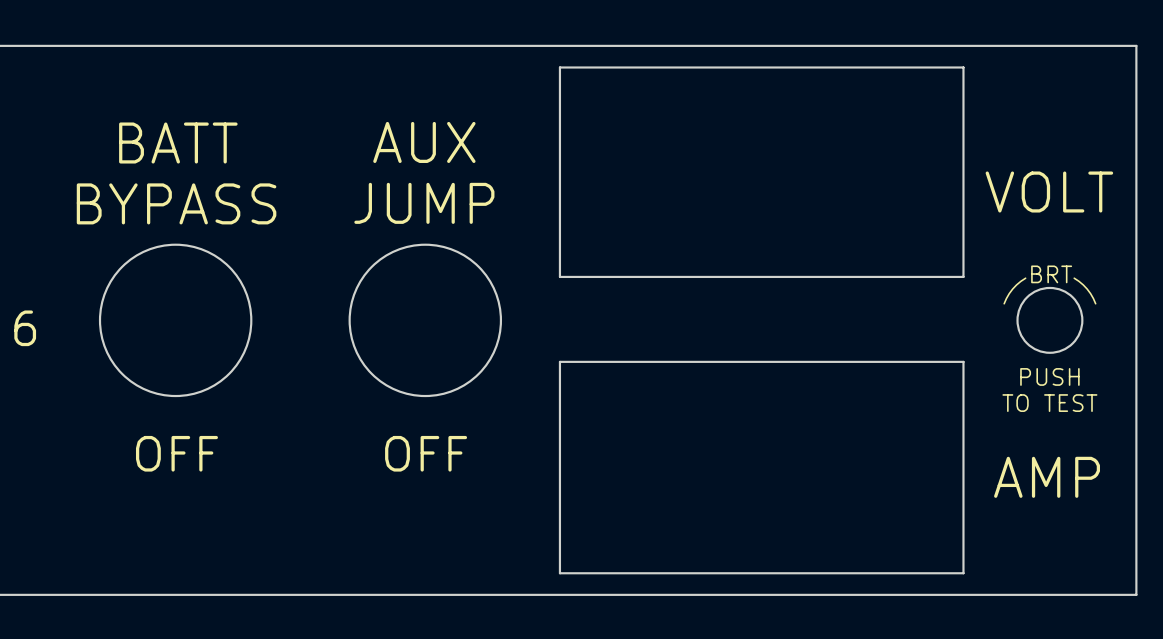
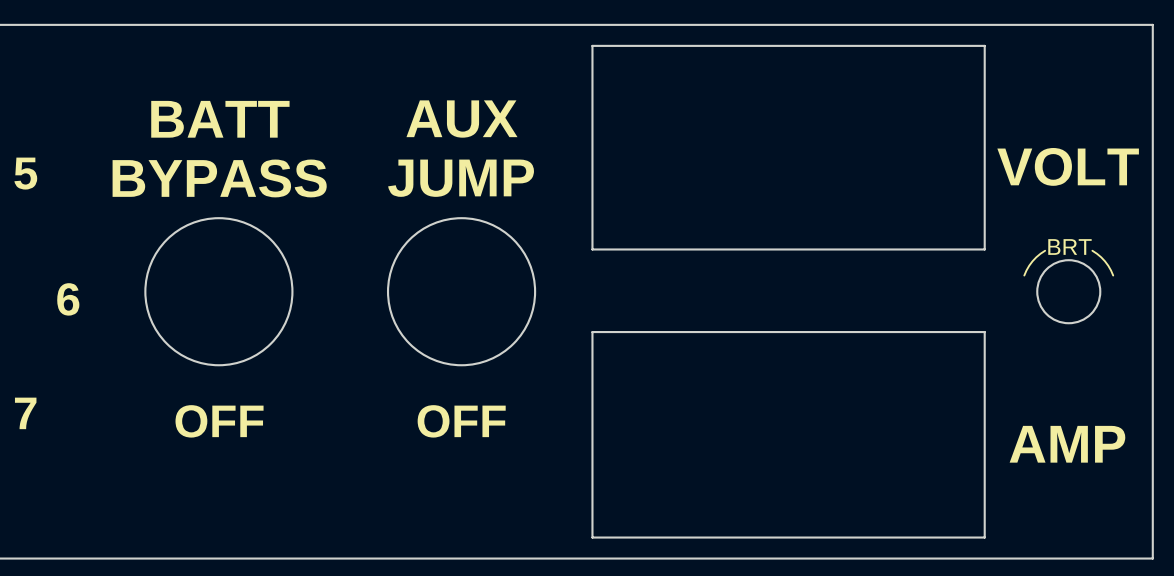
text: PUSH (1049, 376) -> none
text: TO TEST (1049, 403) -> none

